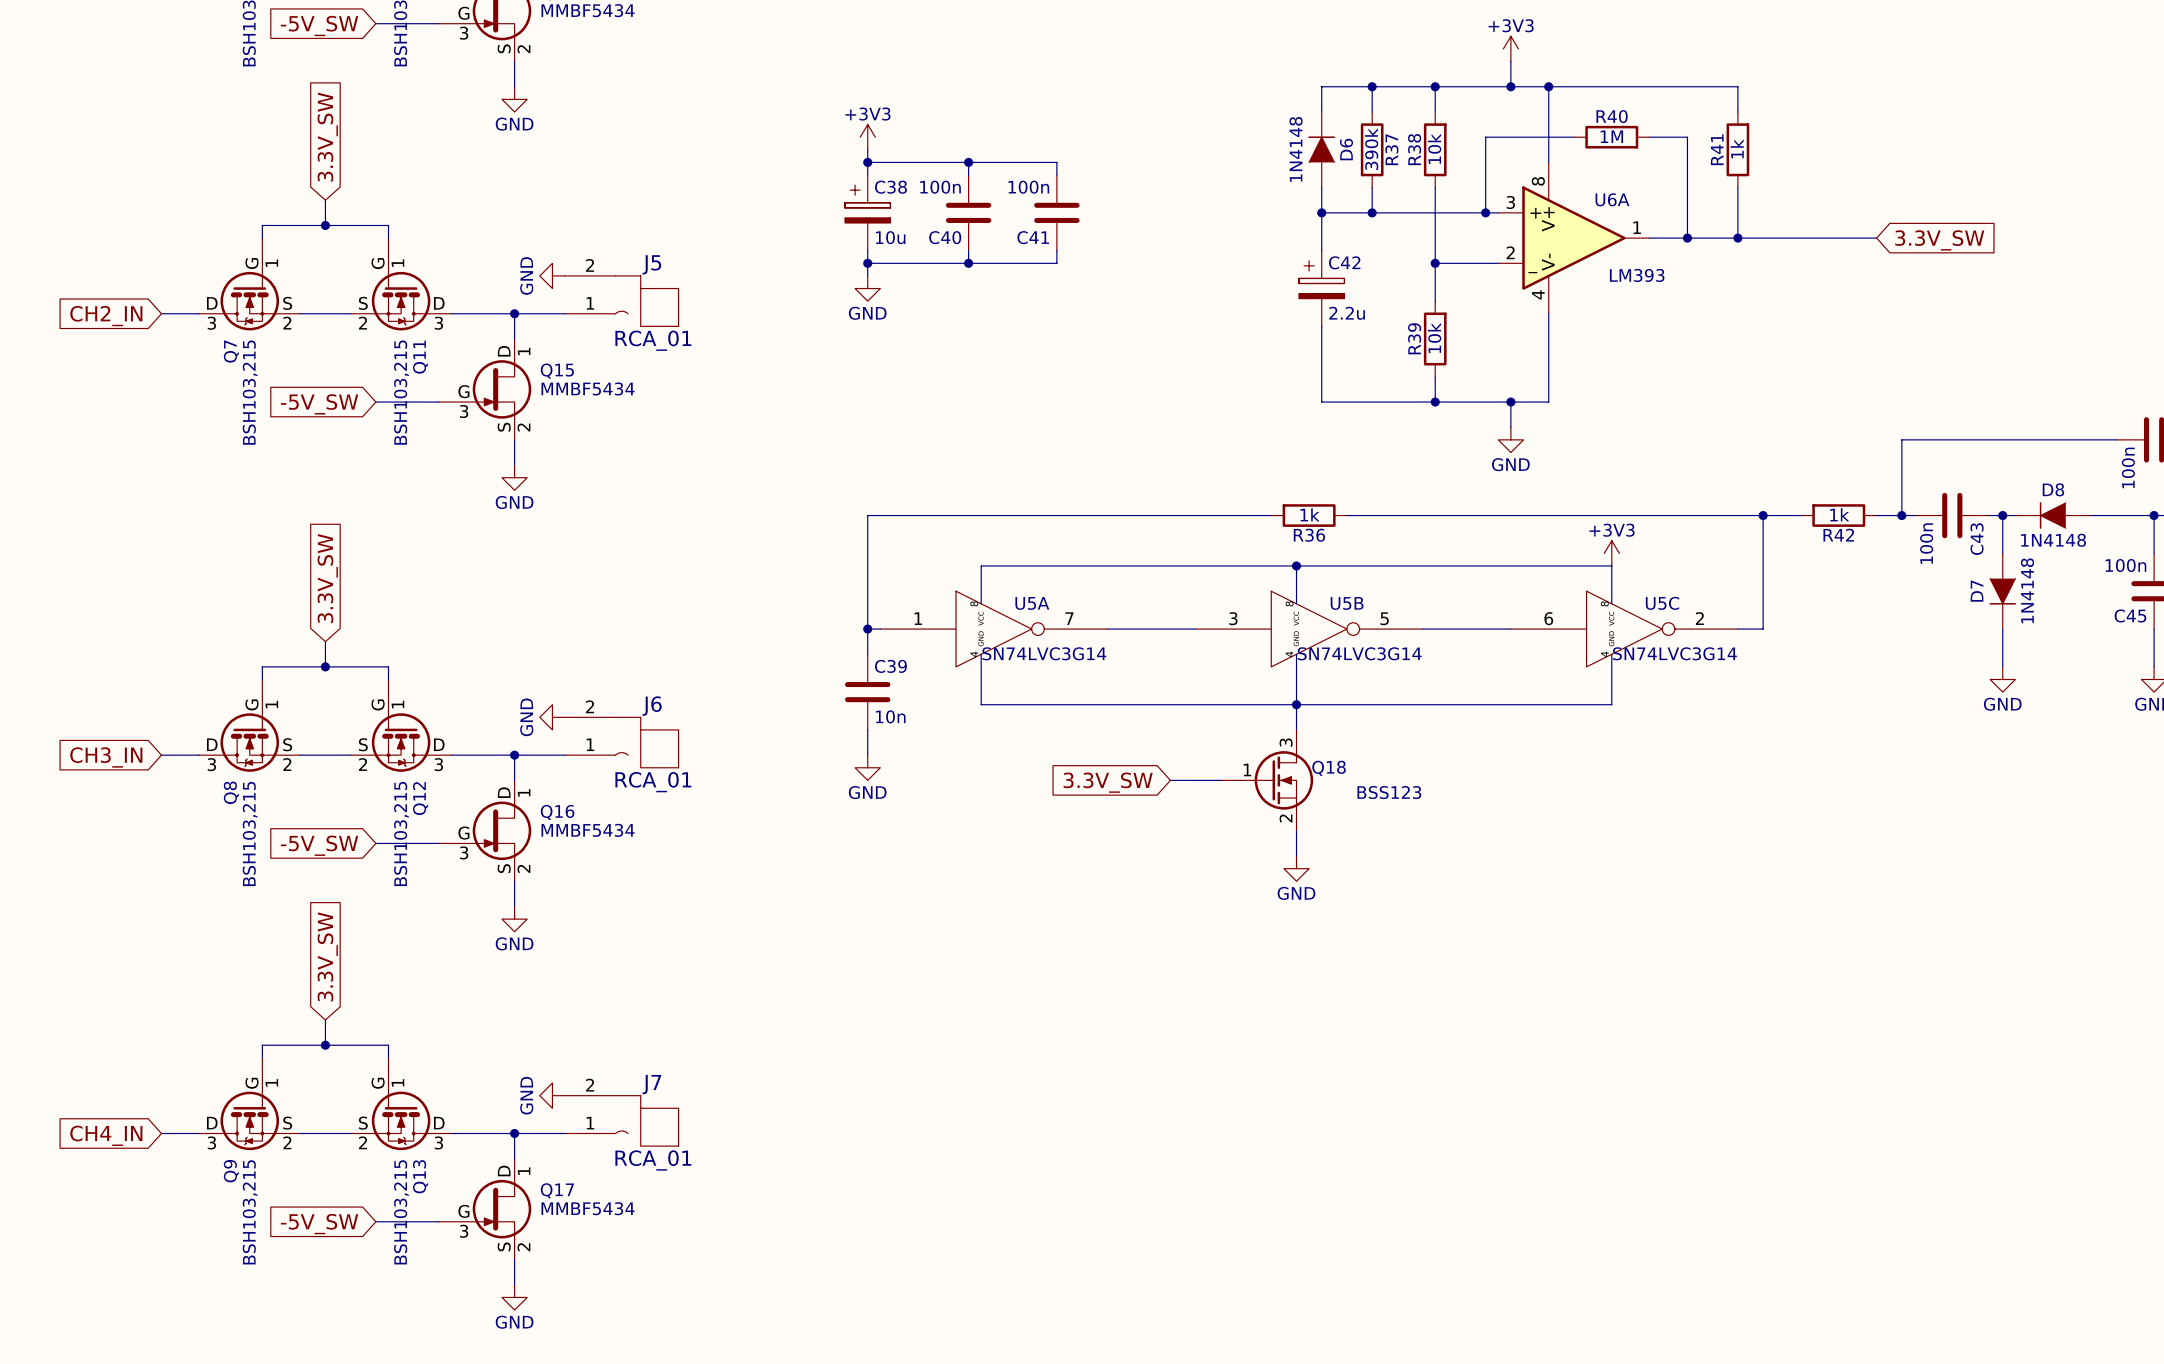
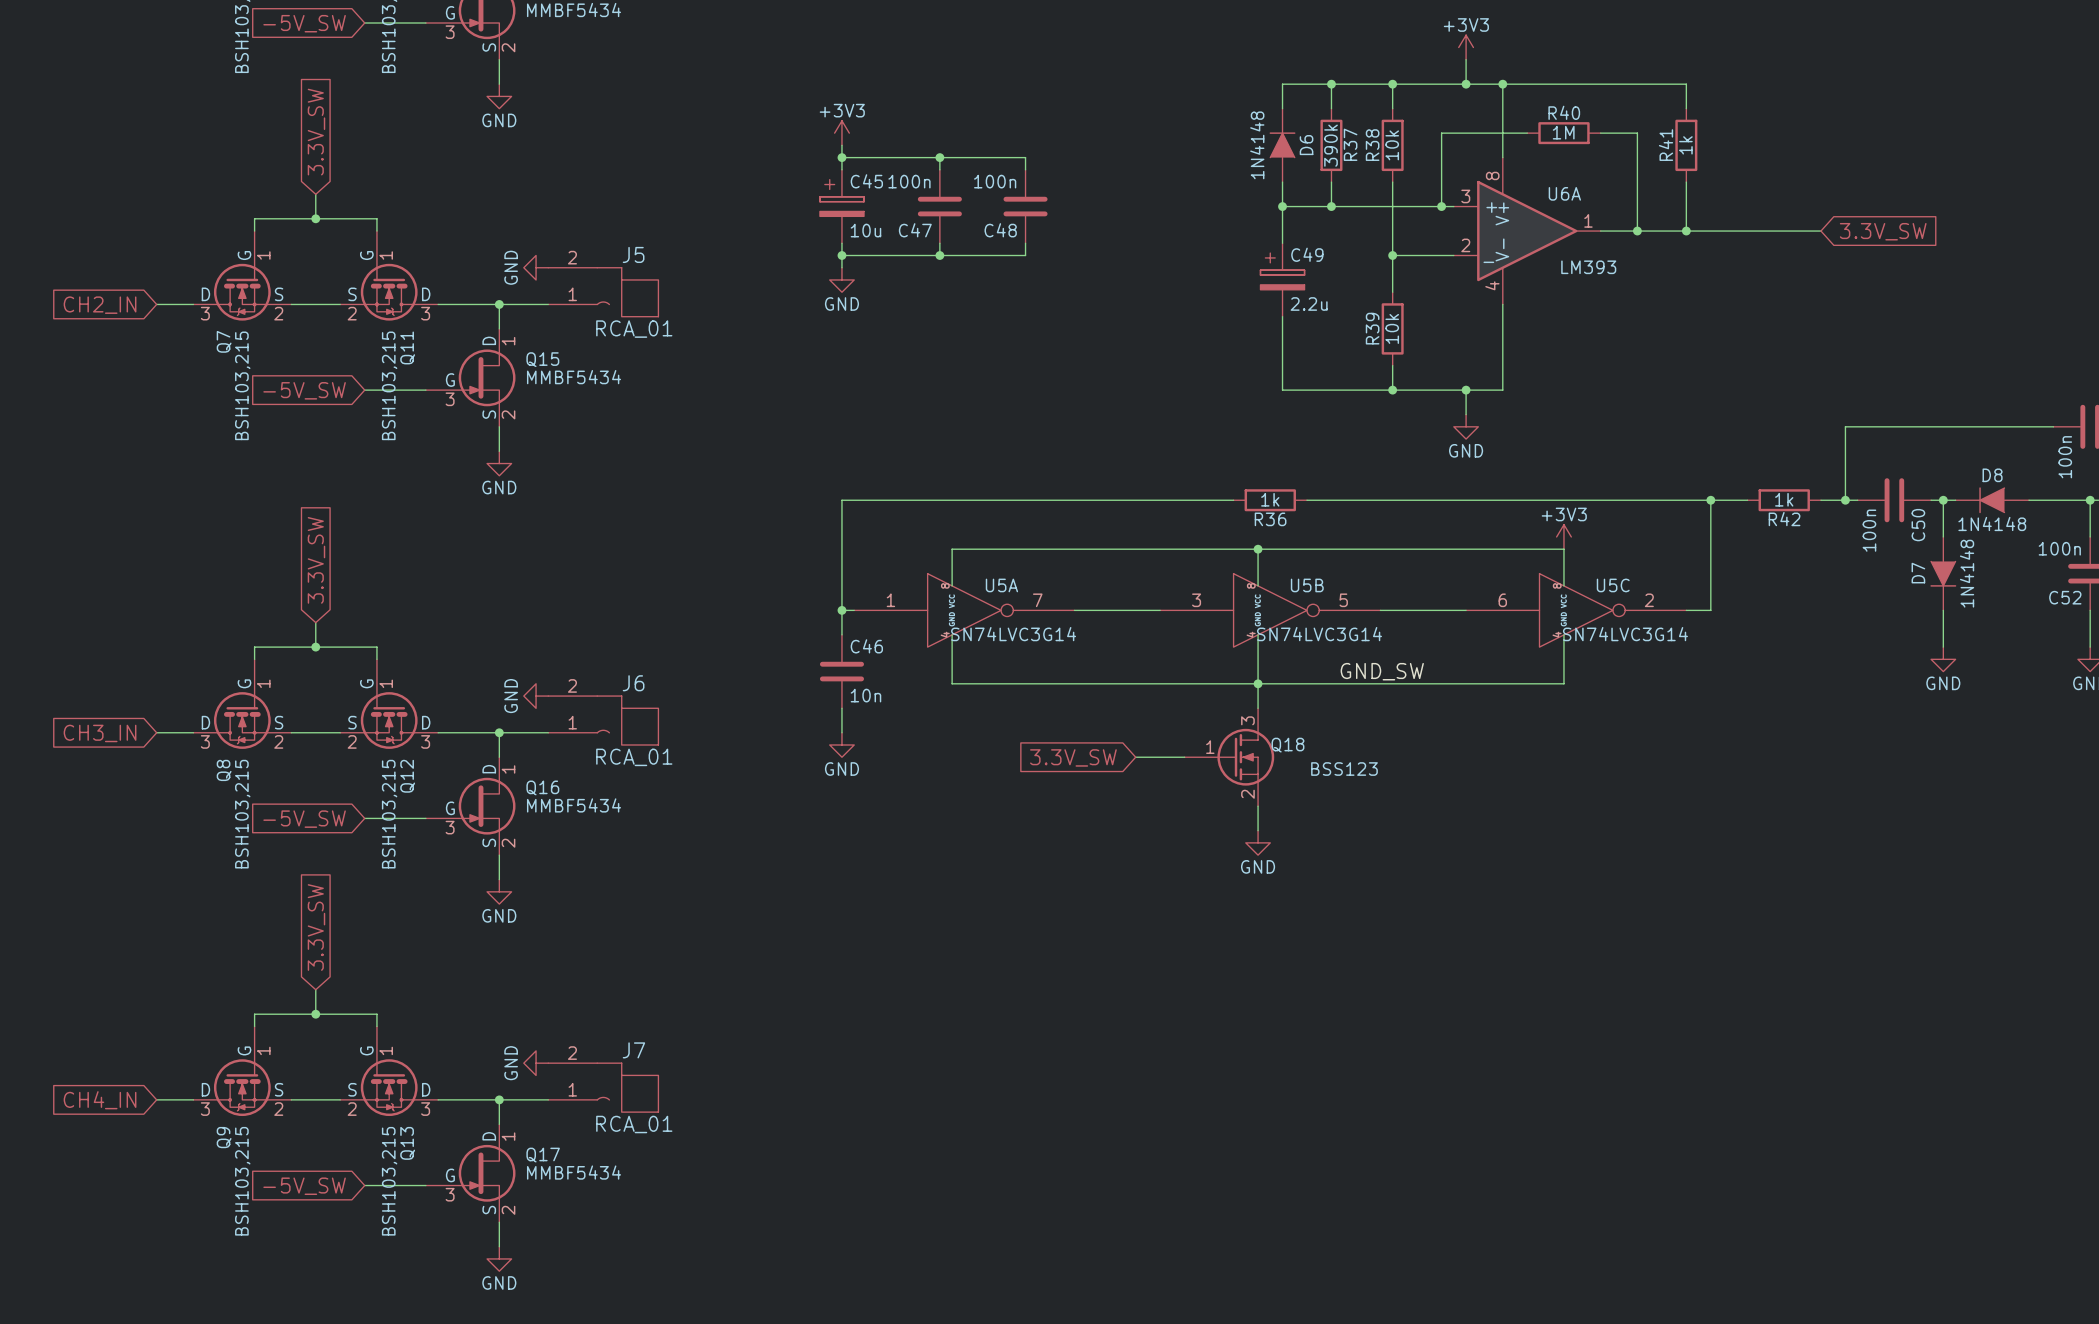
C38 name: C38 (890, 187) -> C45 (866, 181)
C40 name: C40 (945, 237) -> C47 (915, 230)
C41 name: C41 (1033, 237) -> C48 (1000, 230)
C42 name: C42 (1344, 262) -> C49 (1307, 254)
C43 name: C43 (1977, 539) -> C50 (1918, 525)
C45 name: C45 (2130, 615) -> C52 (2065, 597)
C39 name: C39 (890, 666) -> C46 (866, 646)
label: none -> GND_SW (1382, 671)

